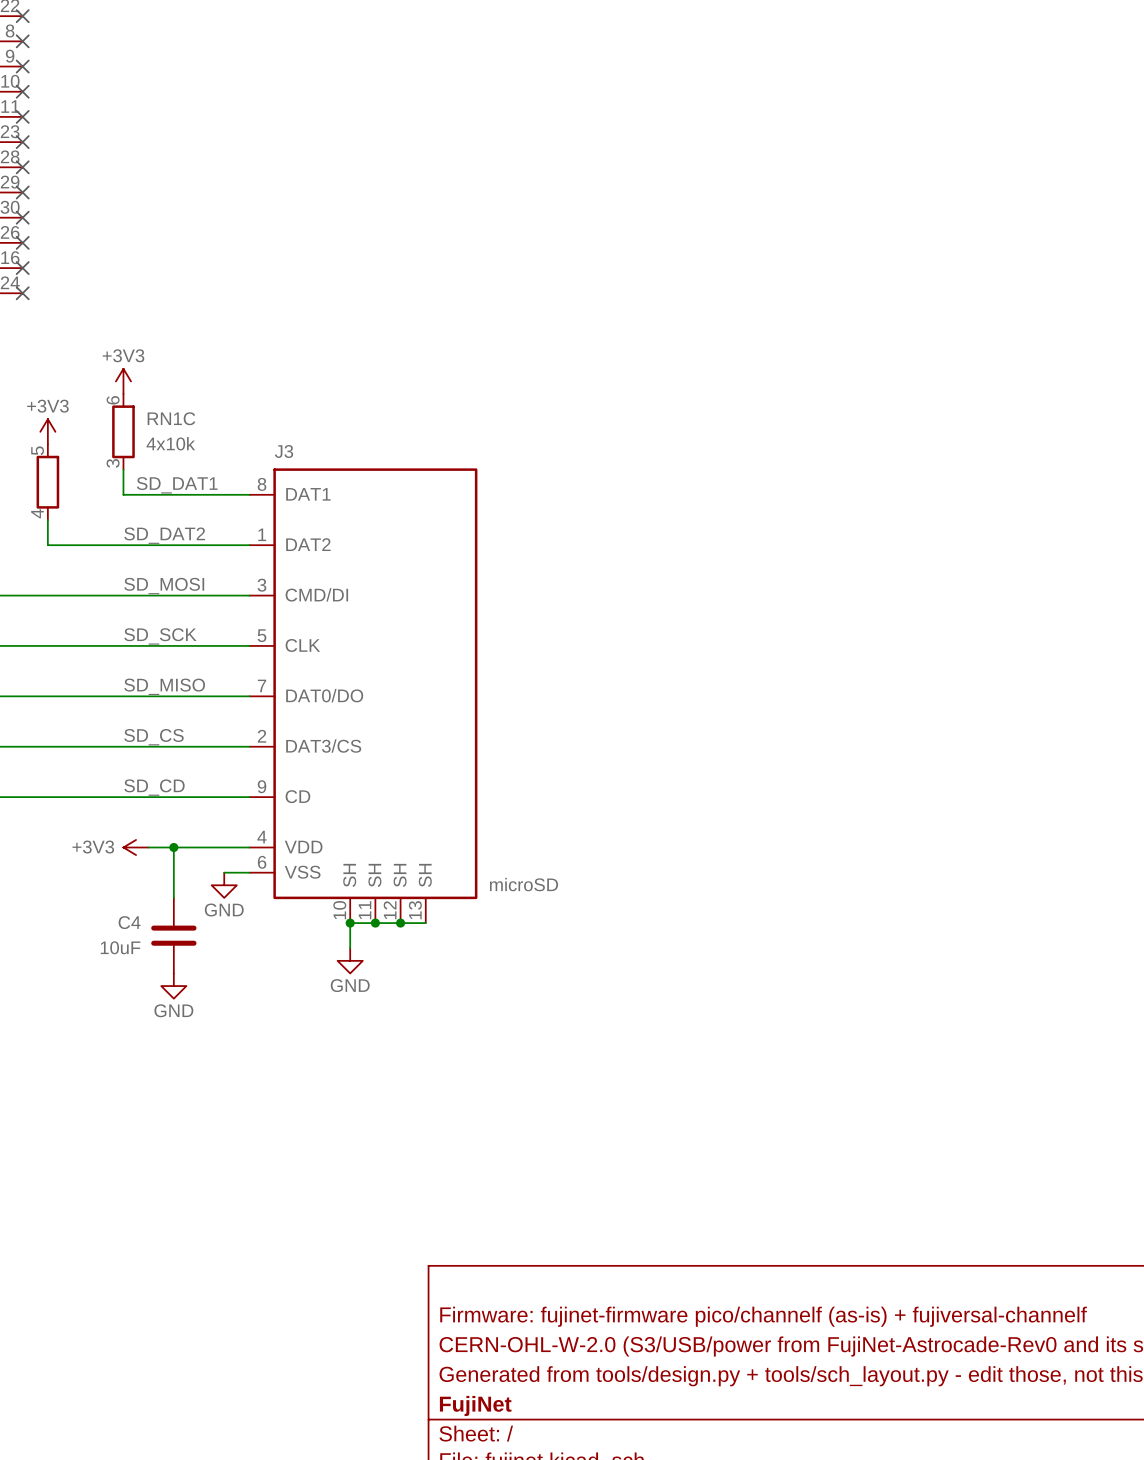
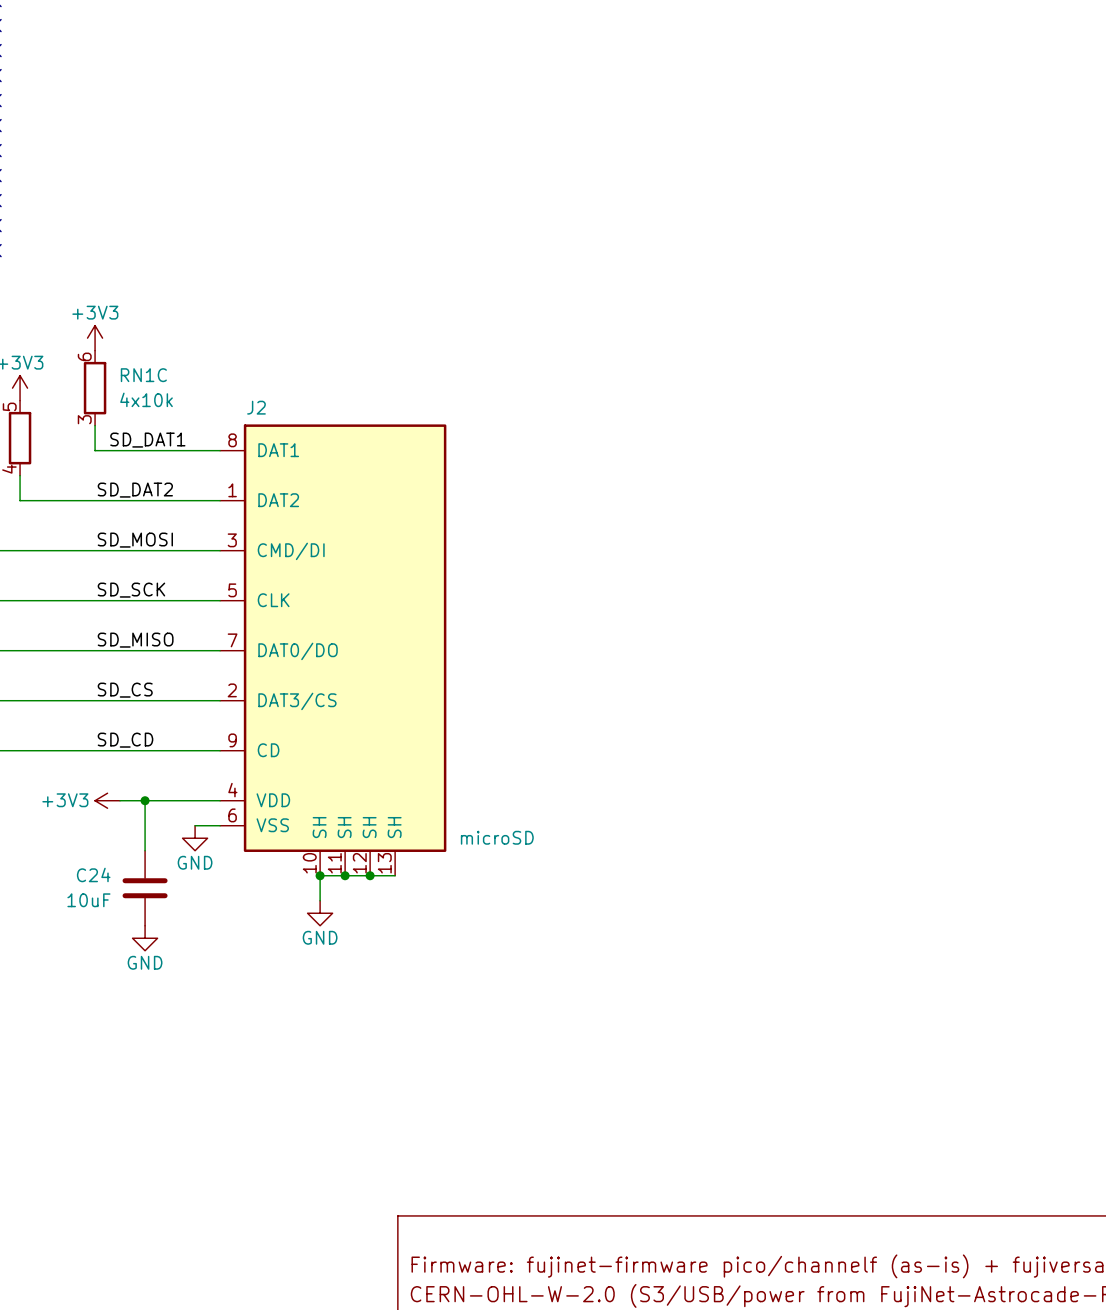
J3 name: J3 (284, 451) -> J2 (256, 407)
C4 name: C4 (129, 922) -> C24 (93, 874)

